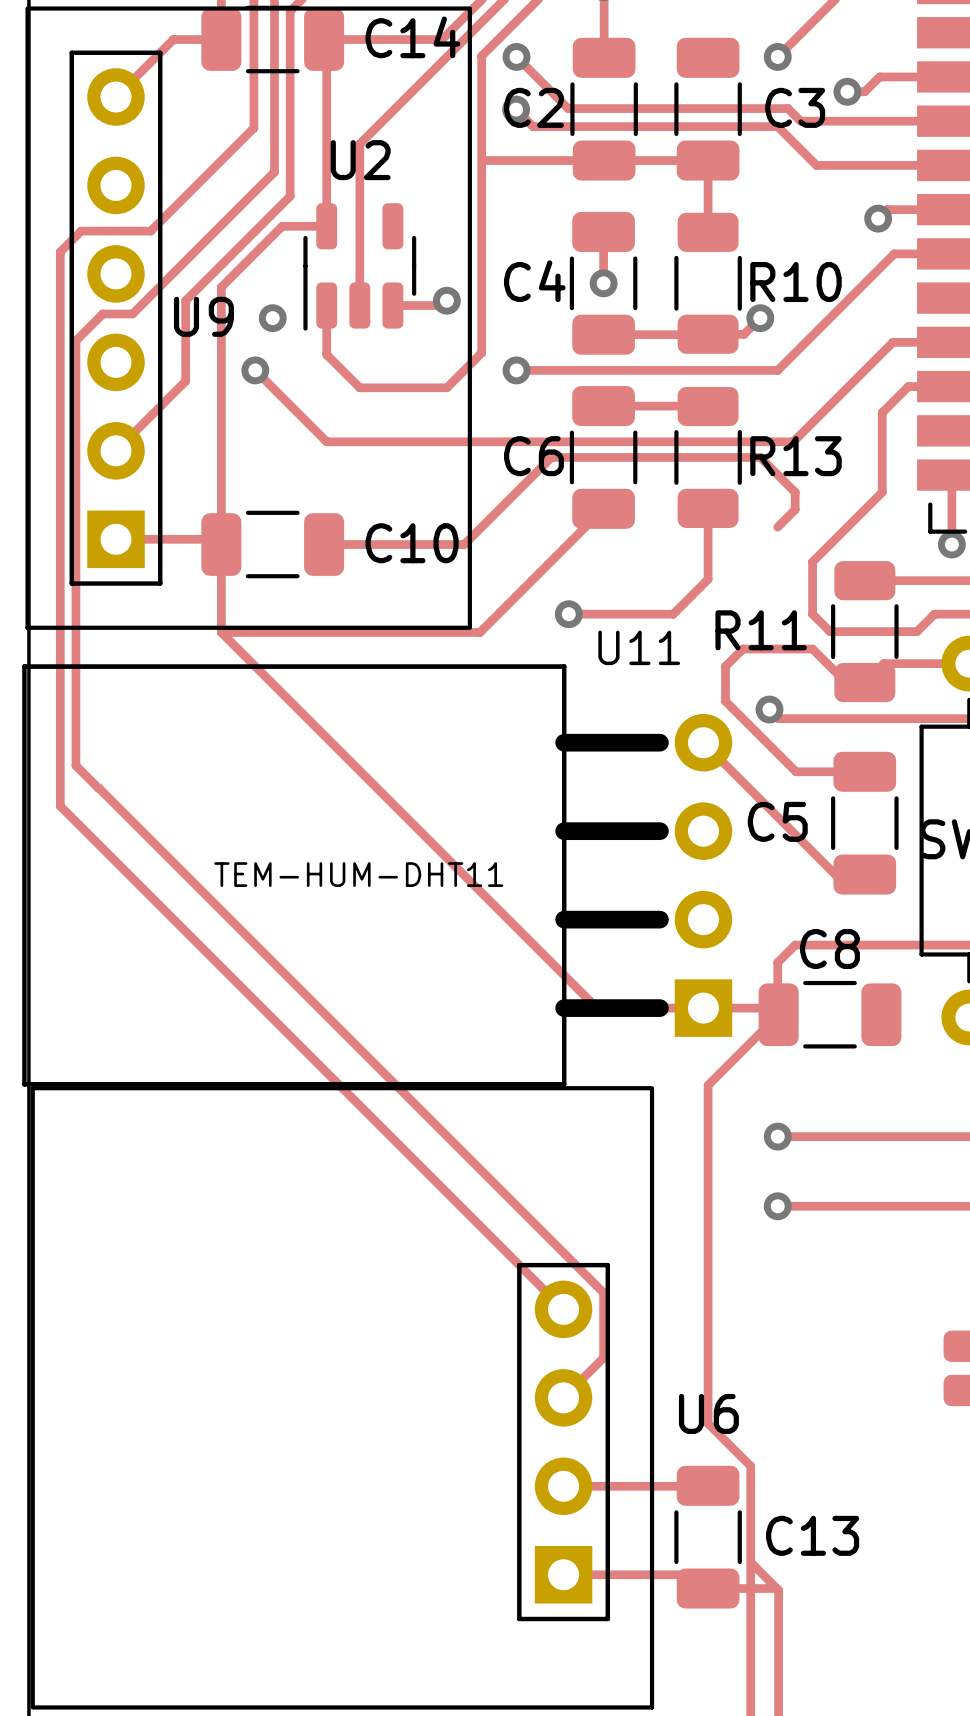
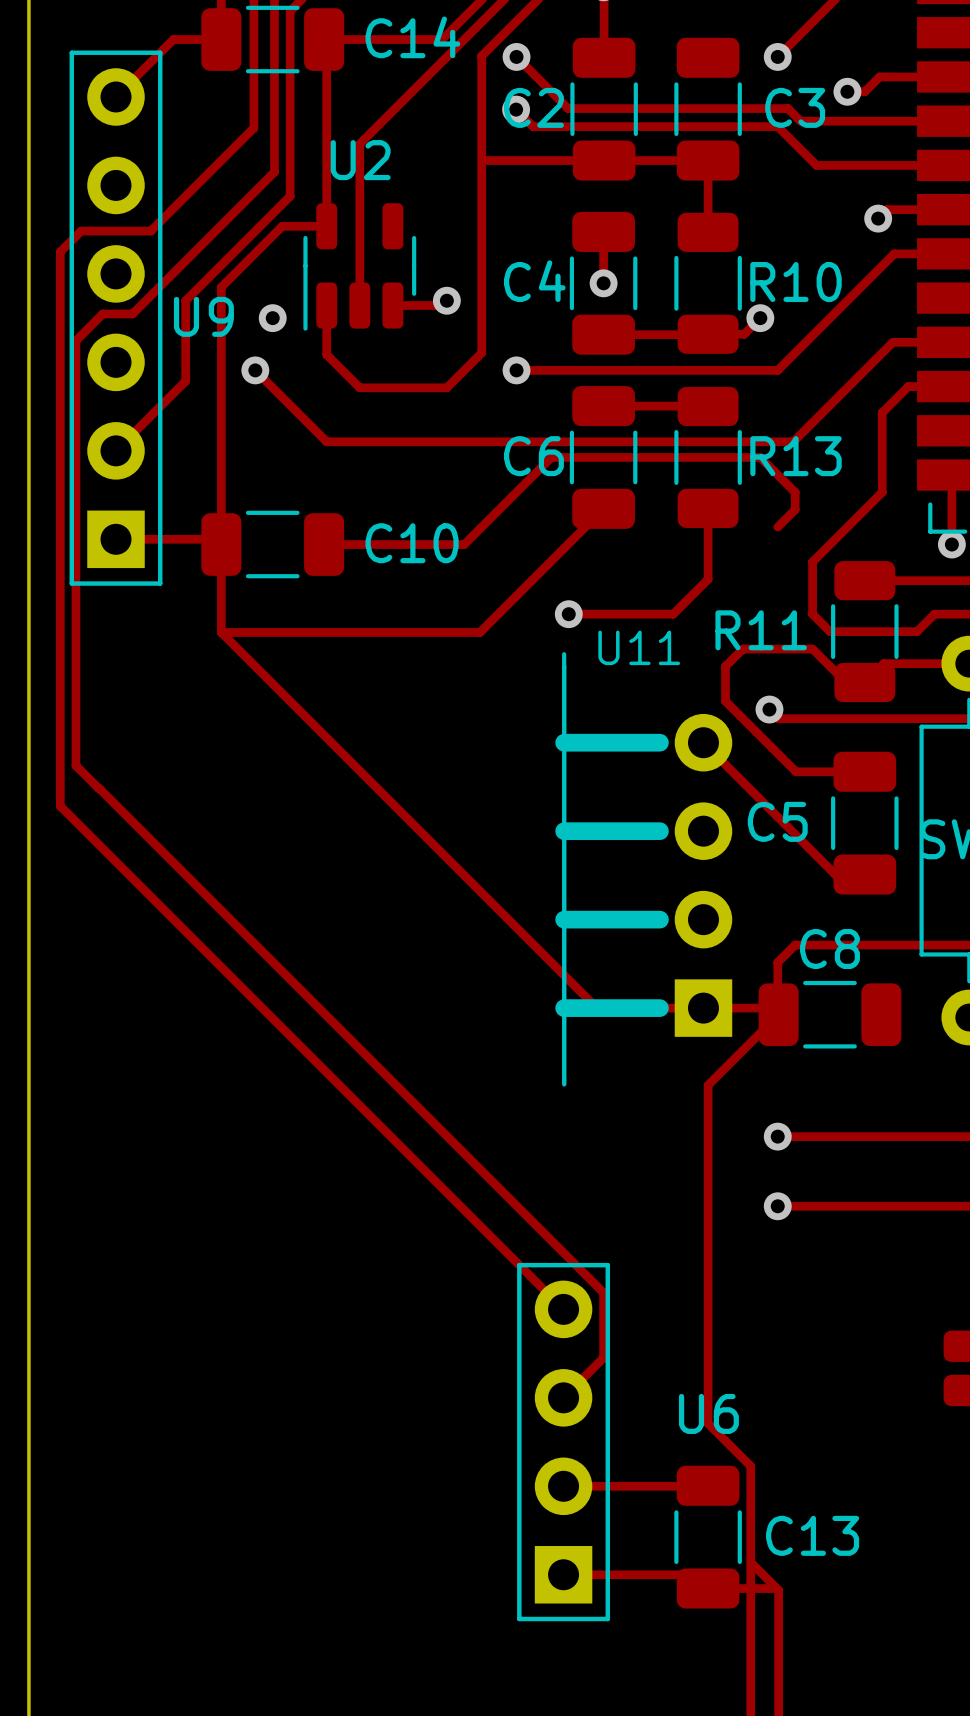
U9 footprint: [25, 6, 472, 630] -> [69, 50, 163, 586]
U11 footprint: [22, 664, 733, 1087] -> [555, 652, 733, 1087]
U11 value: TEM-HUM-DHT11 (358, 874) -> none
U6 footprint: [30, 1086, 655, 1710] -> [517, 1262, 611, 1622]

